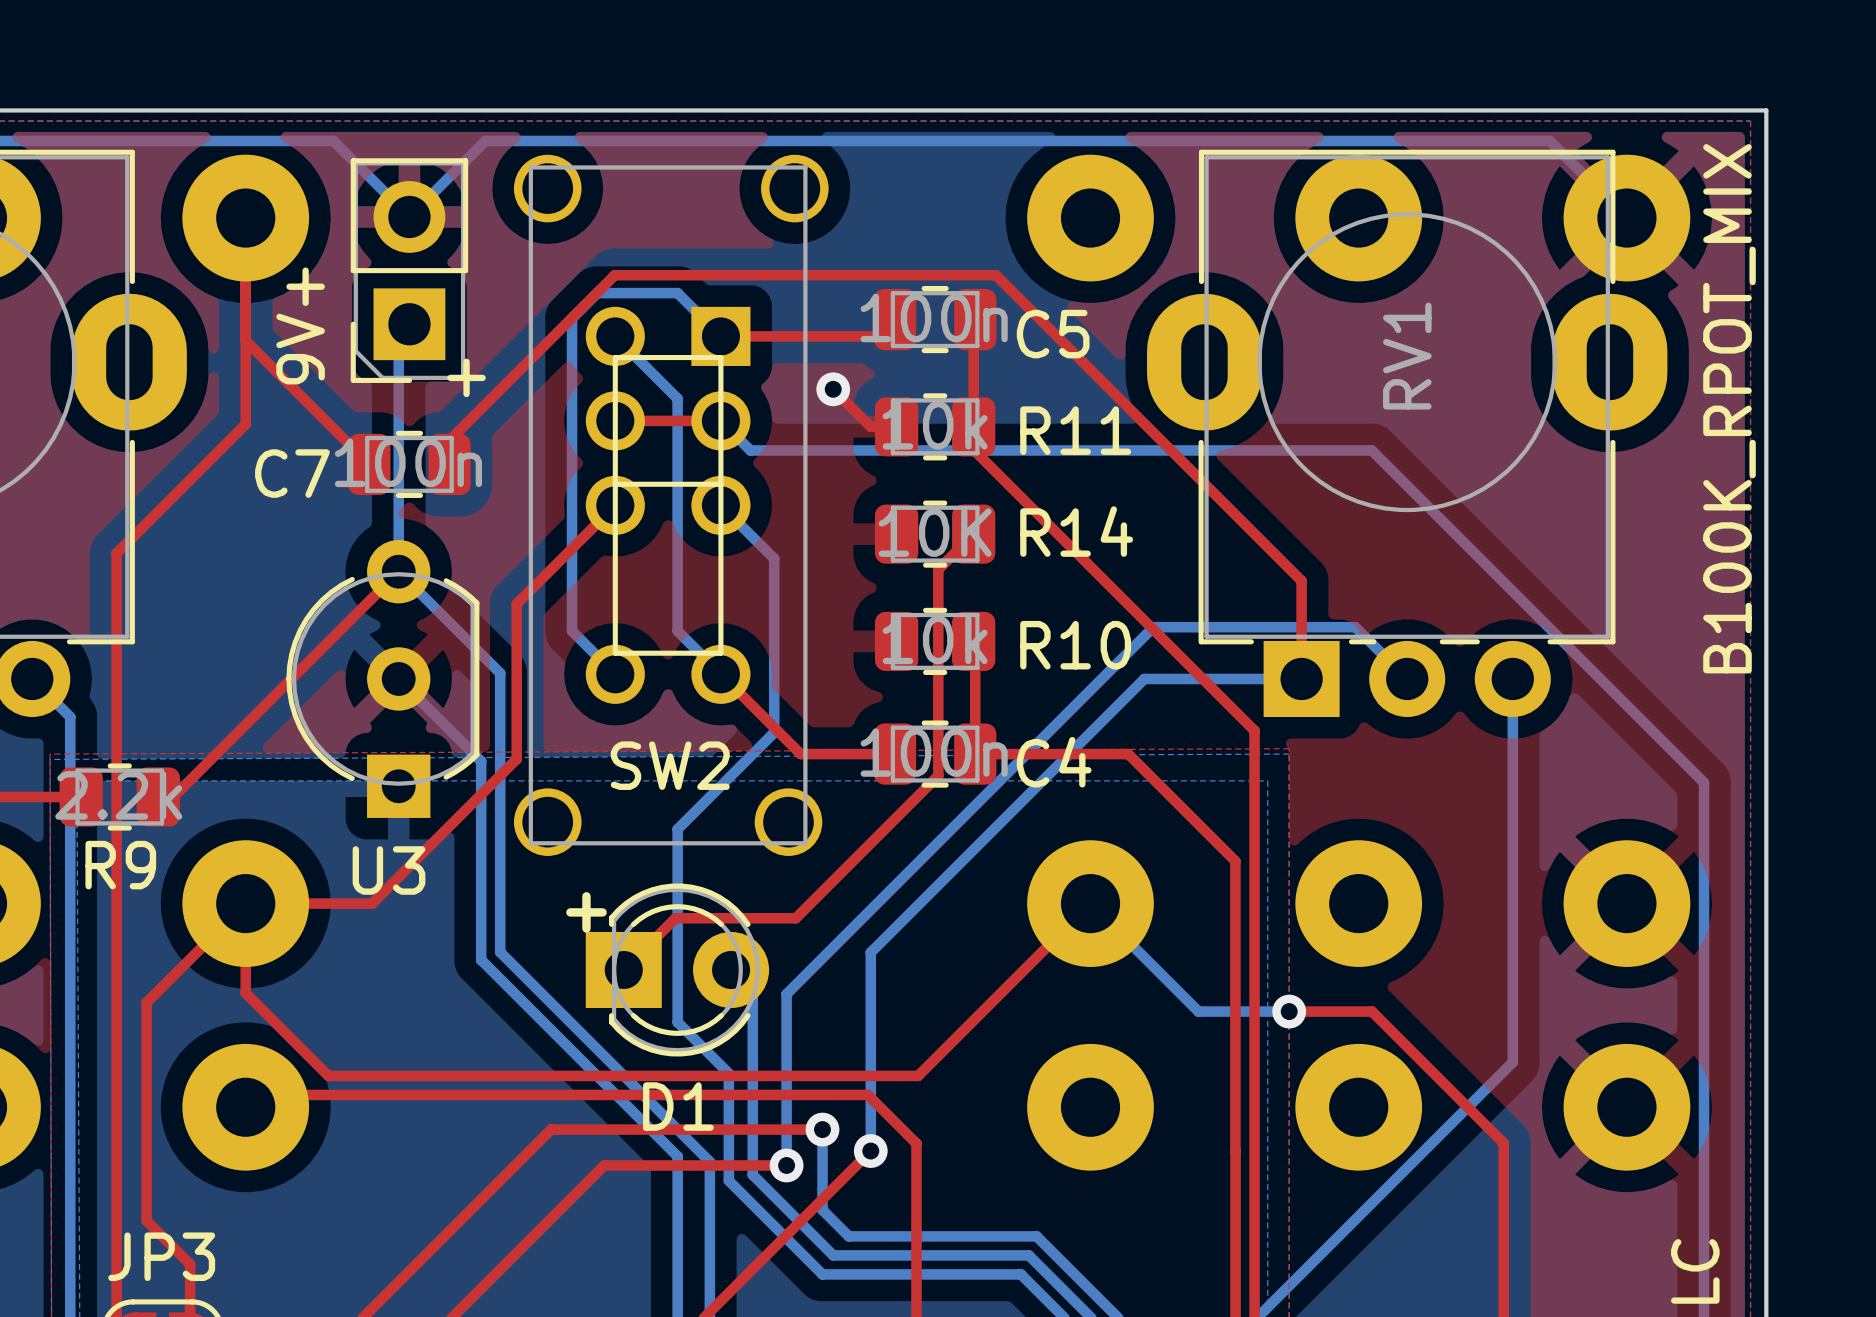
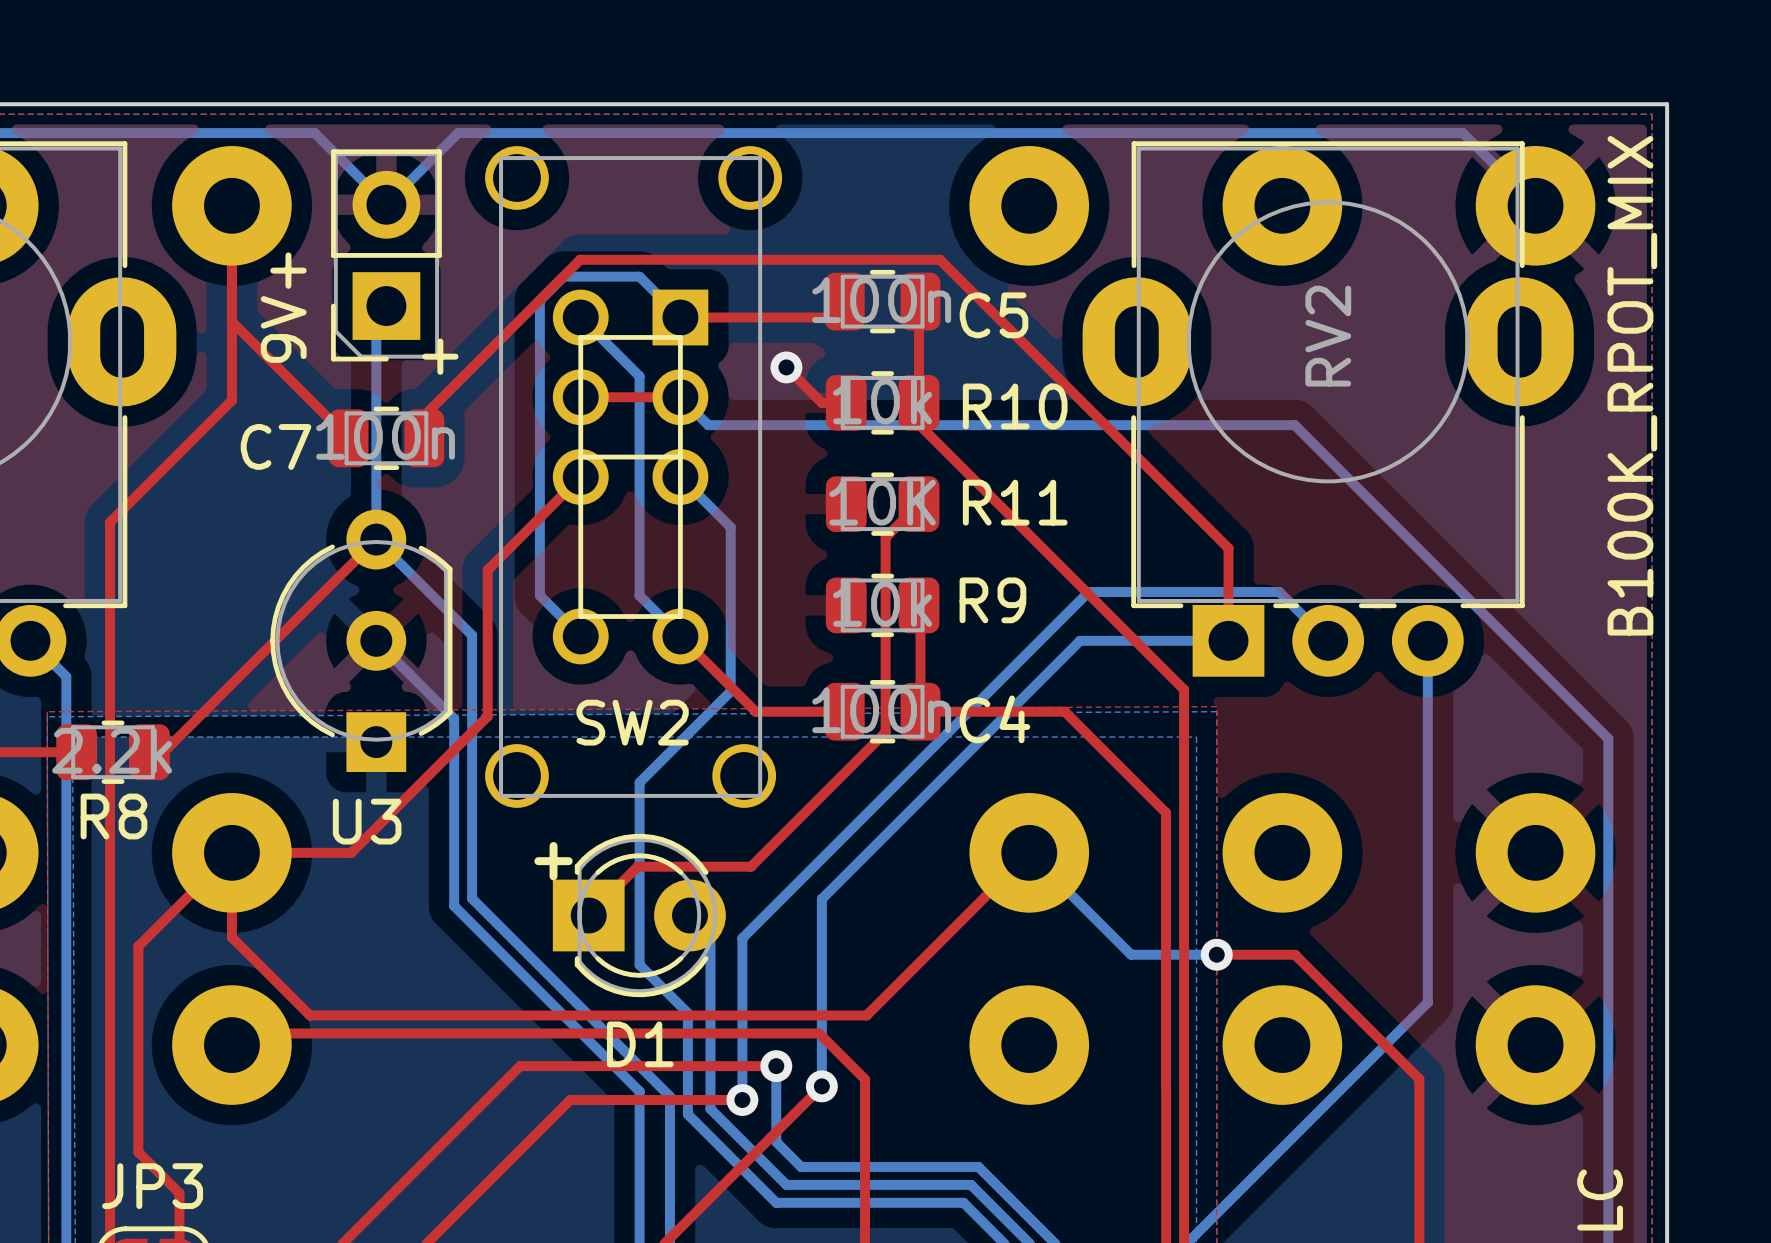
RV1 name: RV1 (1407, 356) -> RV2 (1328, 336)
R11 name: R11 (1075, 430) -> R10 (1015, 406)
R14 name: R14 (1076, 531) -> R11 (1015, 502)
R10 name: R10 (1075, 645) -> R9 (992, 600)
R9 name: R9 (120, 865) -> R8 (114, 816)

